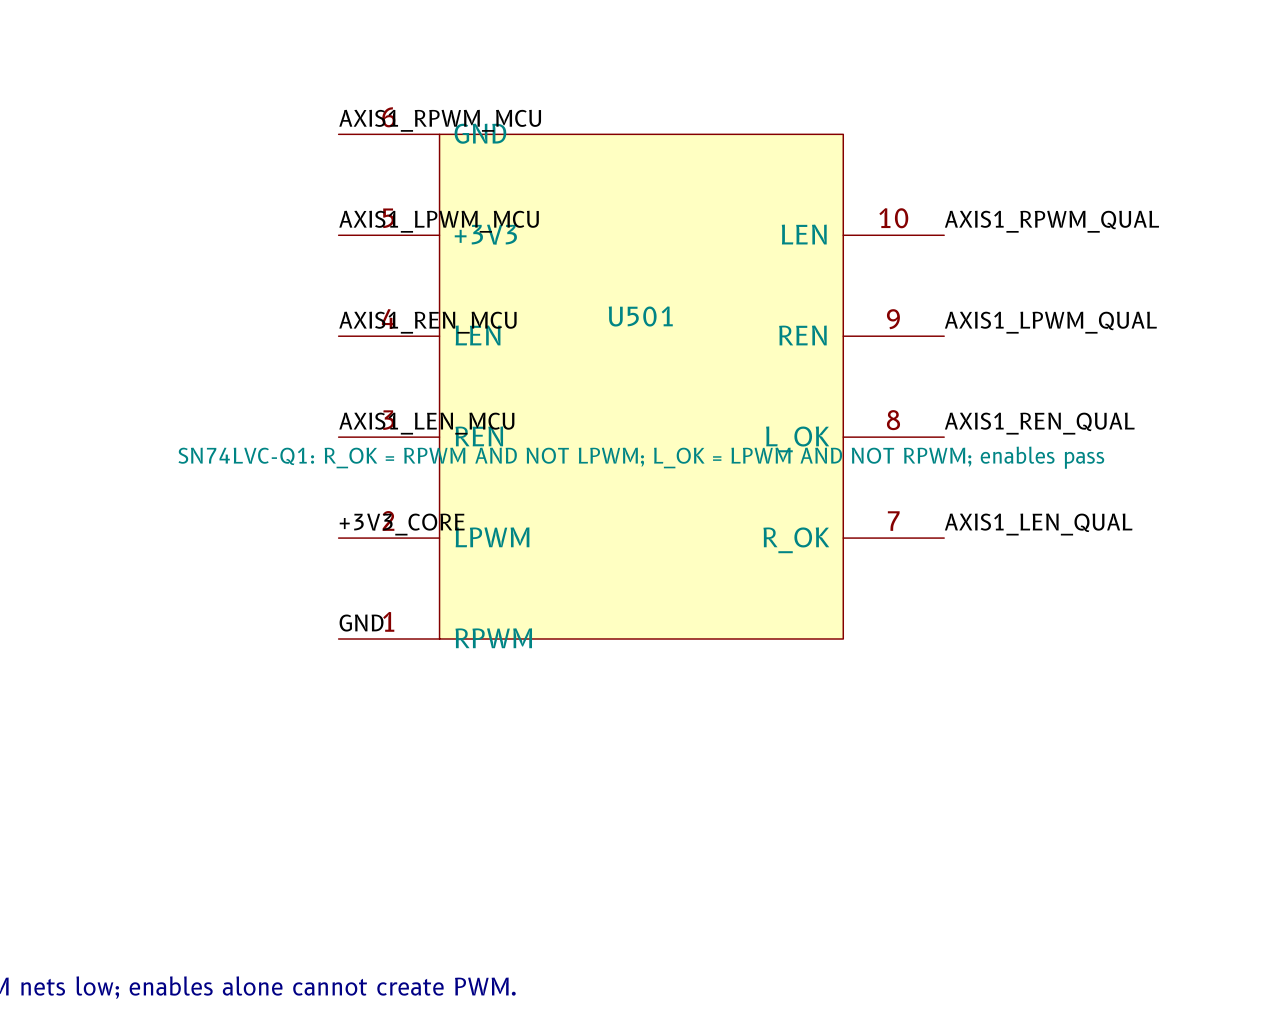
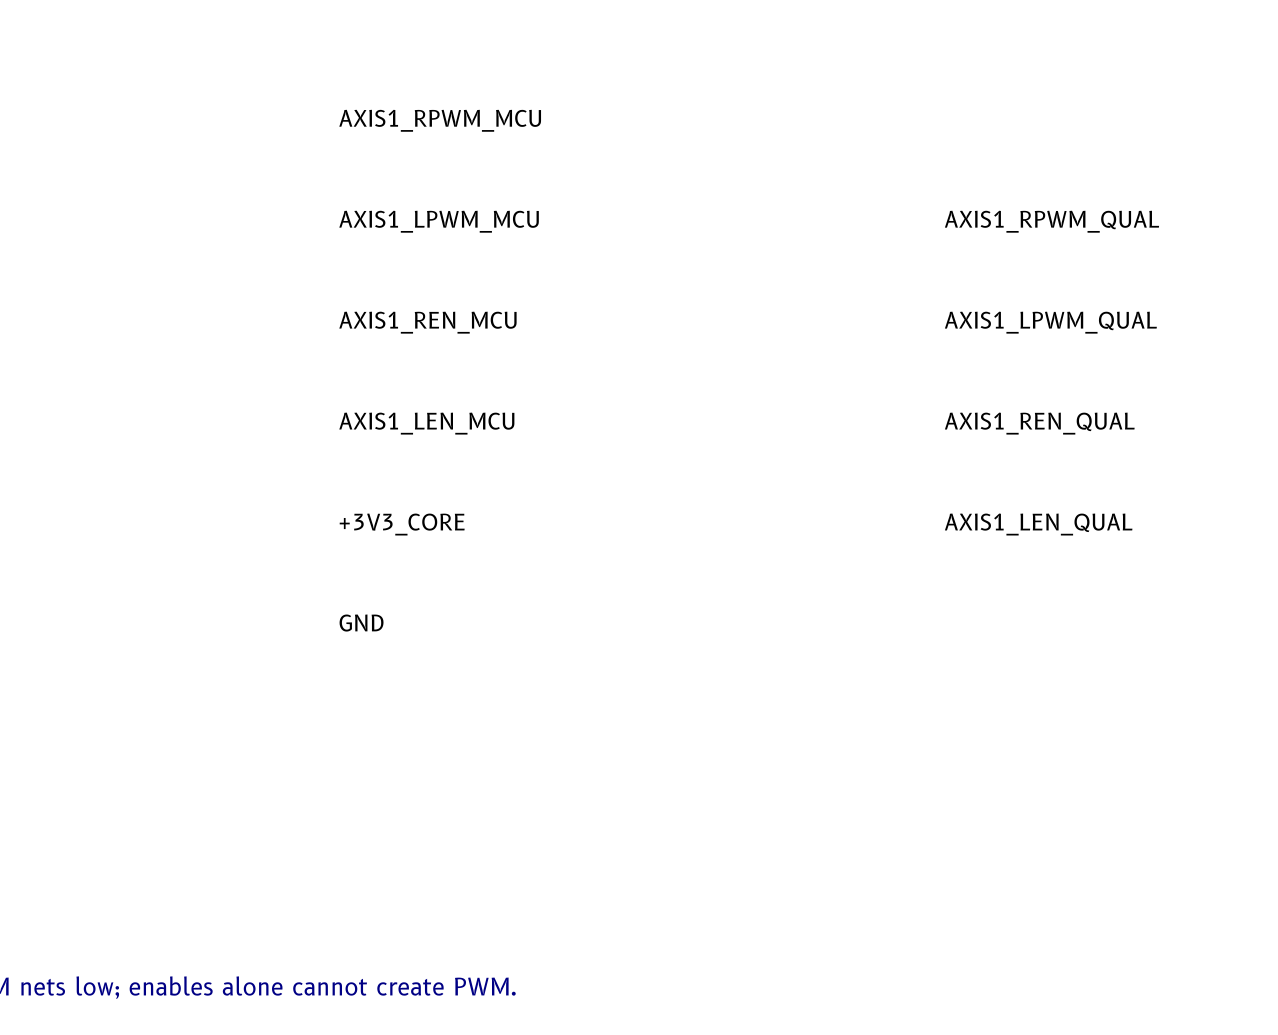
U501: SN74LVC-Q1: R_OK = RPWM AND NOT LPWM; L_OK = LPWM AND NOT RPWM; enables pass (641, 386) -> none

